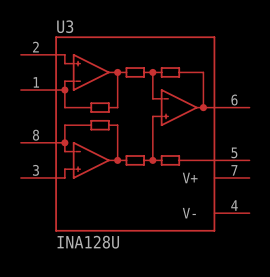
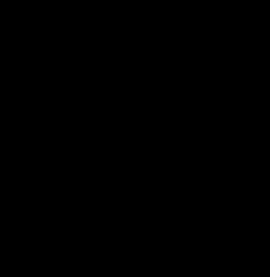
U3: INA128U (135, 134) -> none

